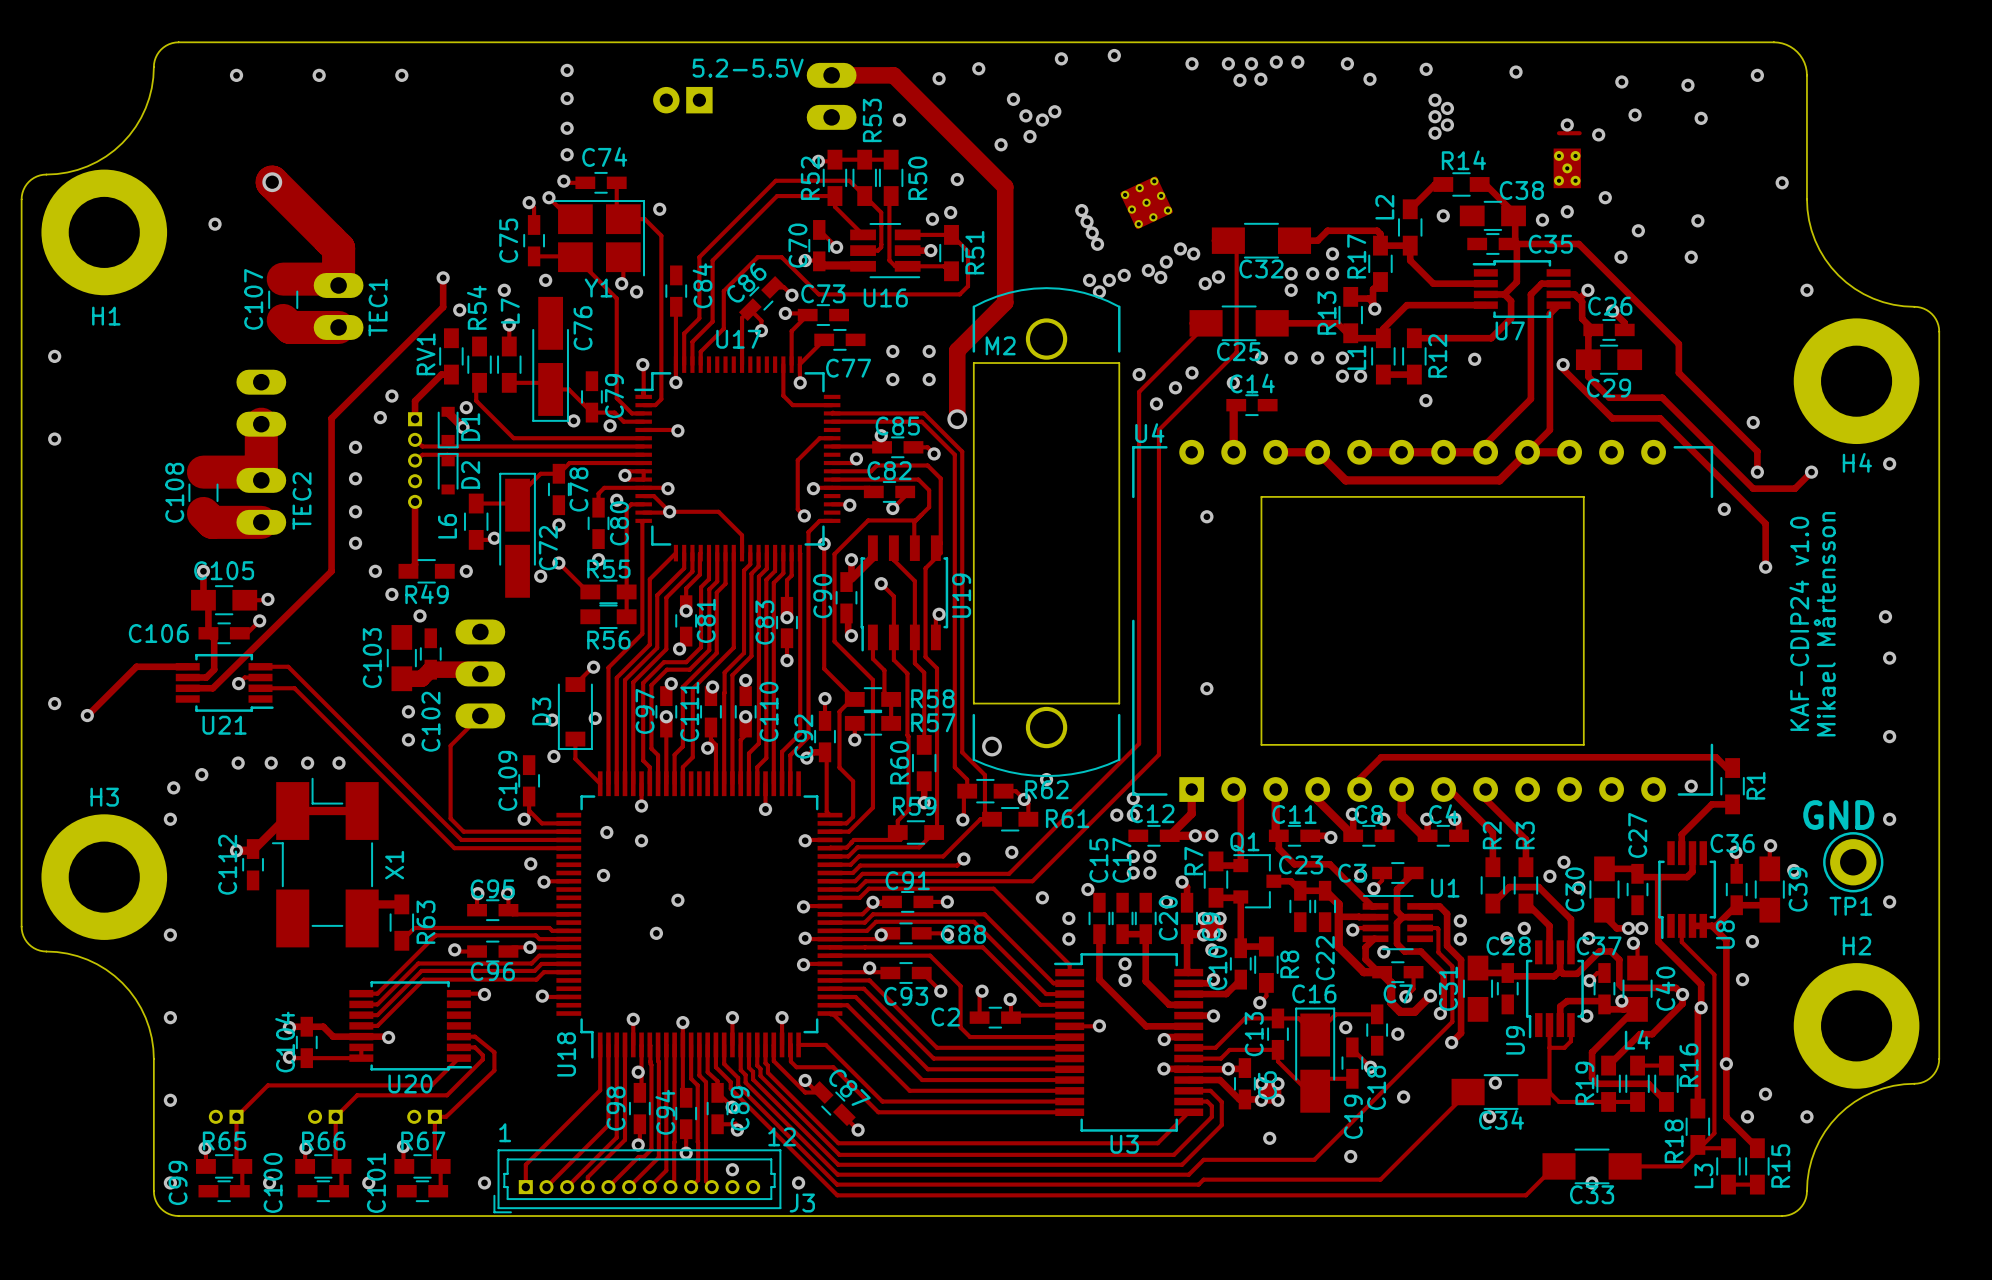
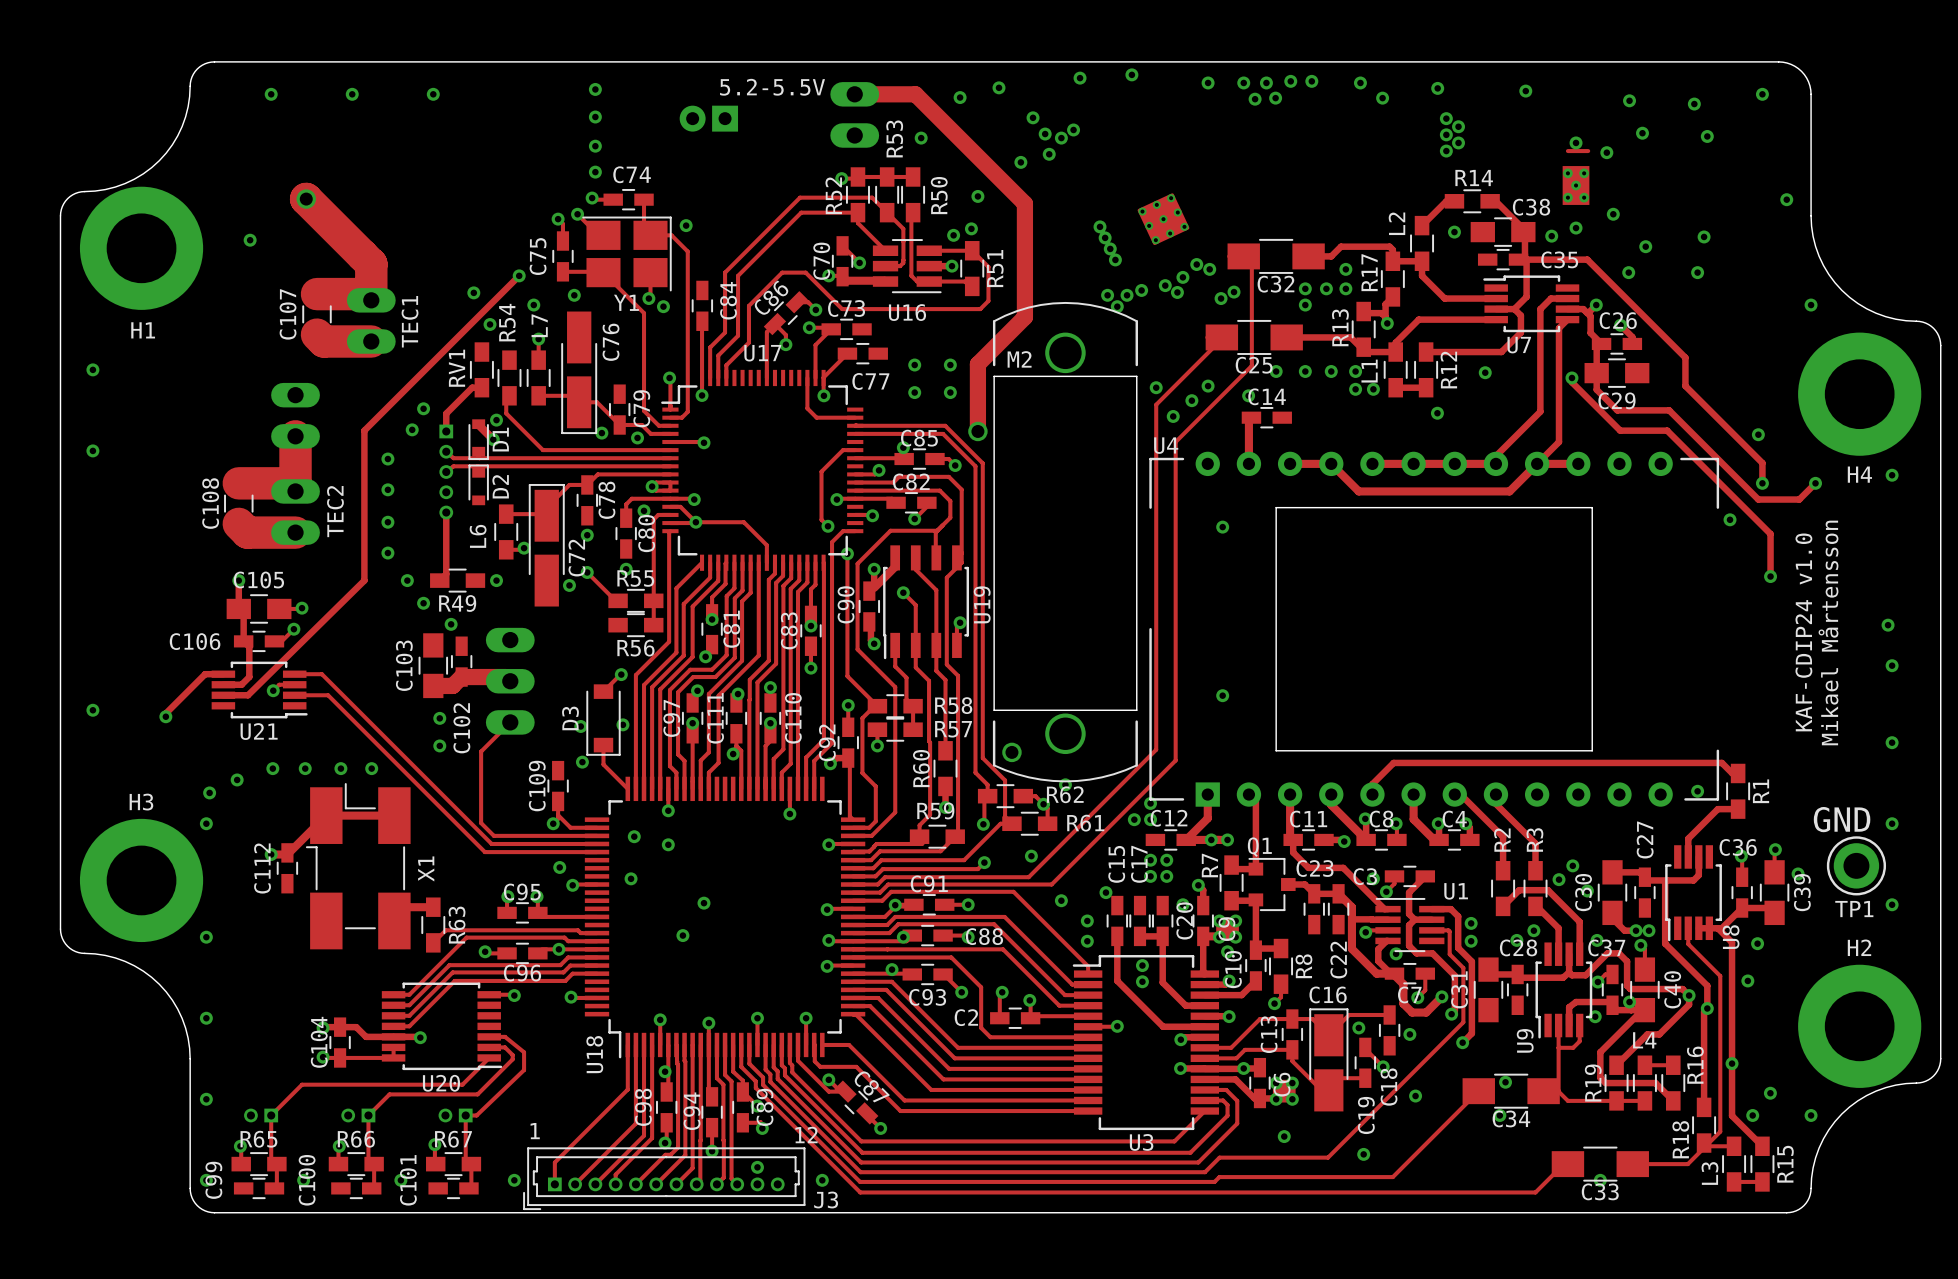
via: none -> (519, 275)
track: (443, 277) (443, 307) (331, 418) -> (520, 274) (364, 430)
track: (169, 666) (136, 666) (87, 715) -> (205, 674) (165, 713) (165, 716)
via position: (87, 715) -> (165, 716)

